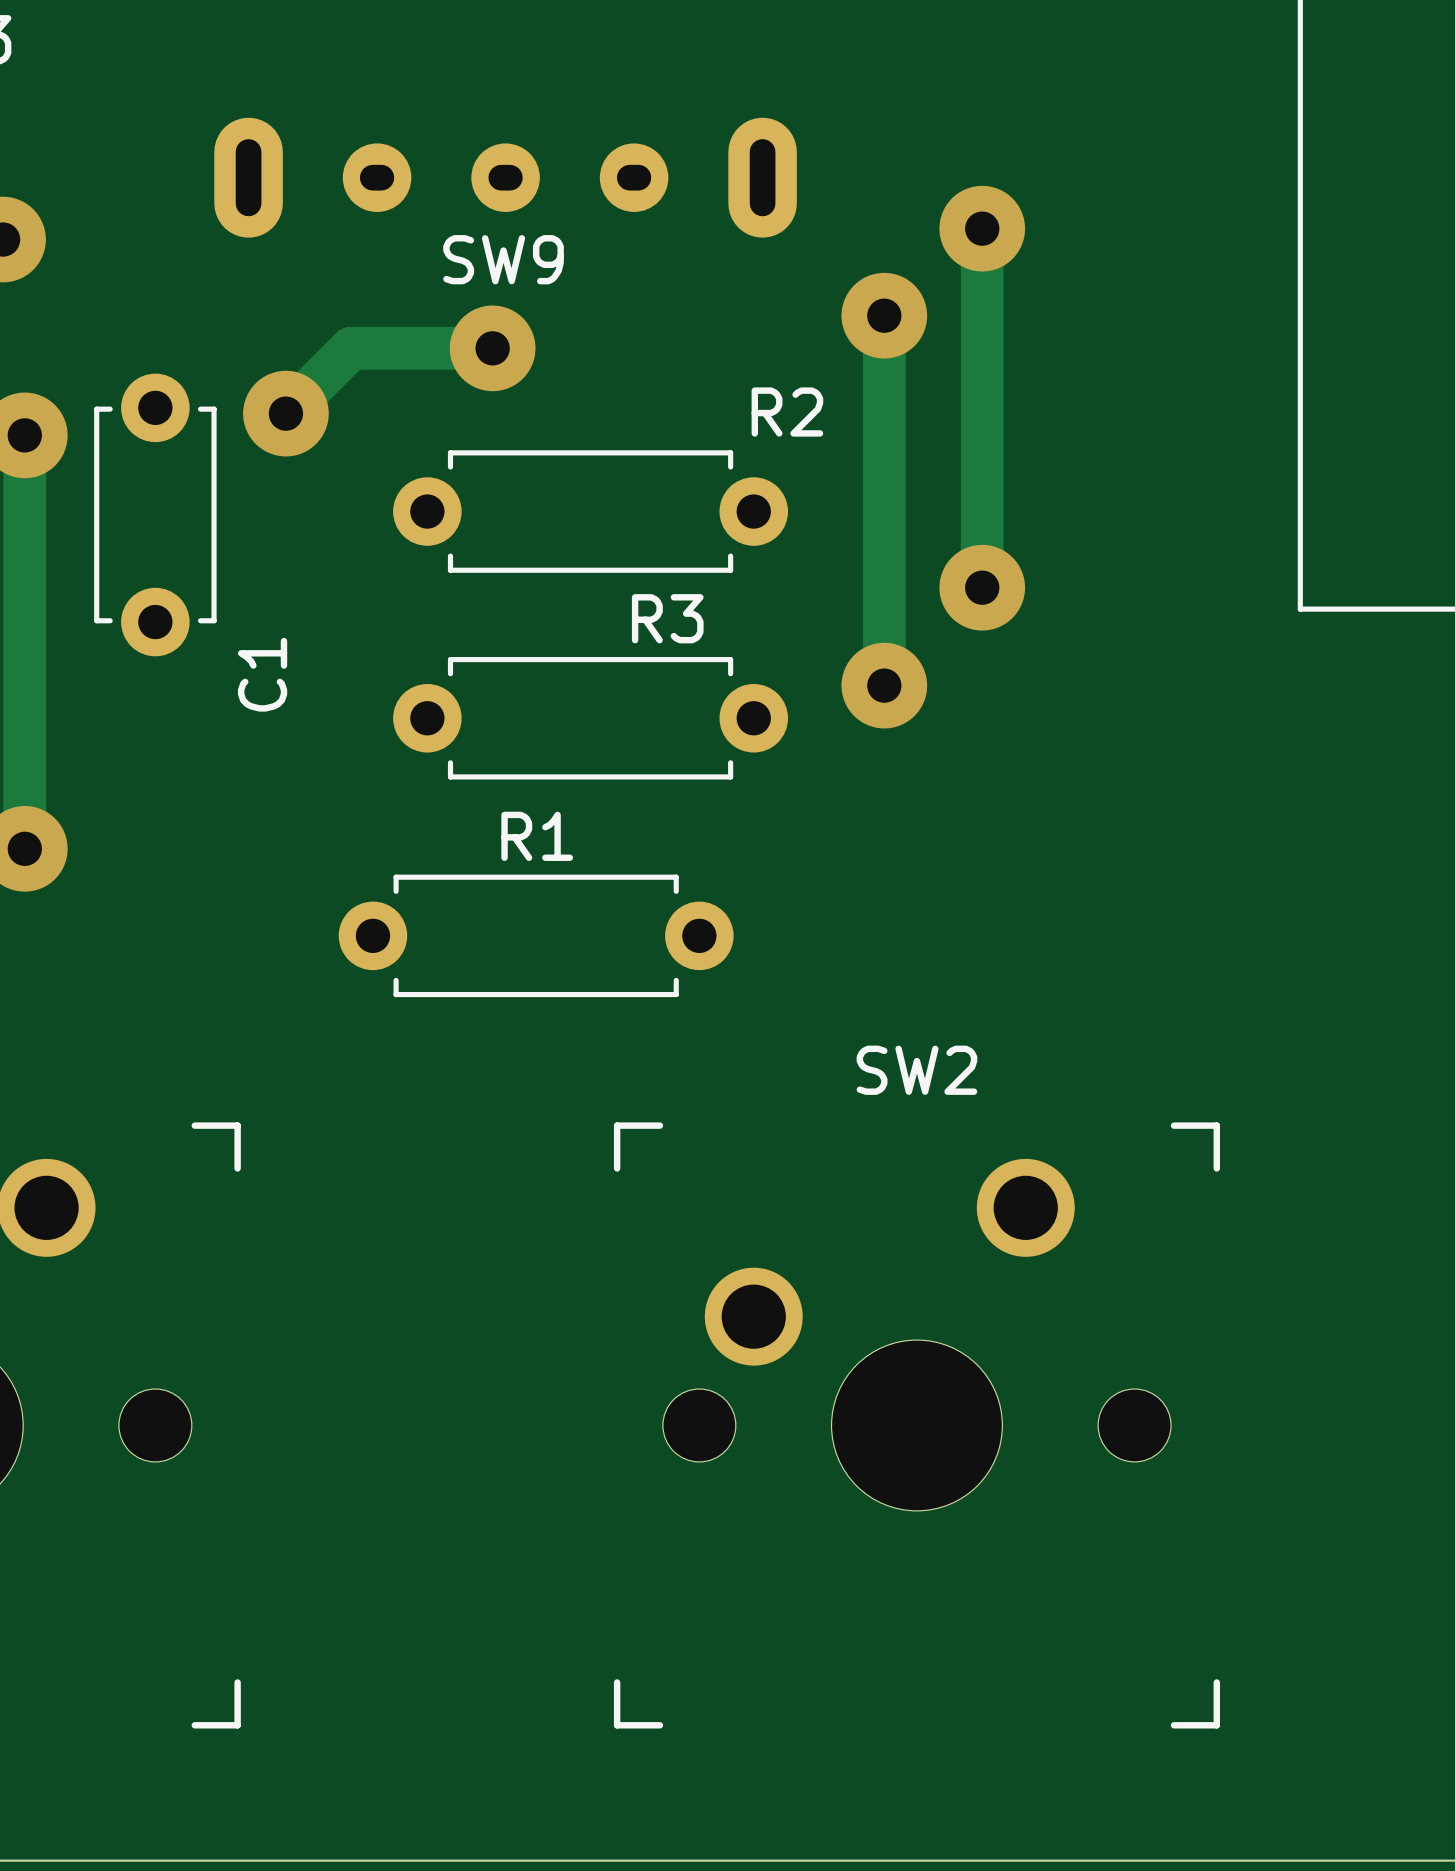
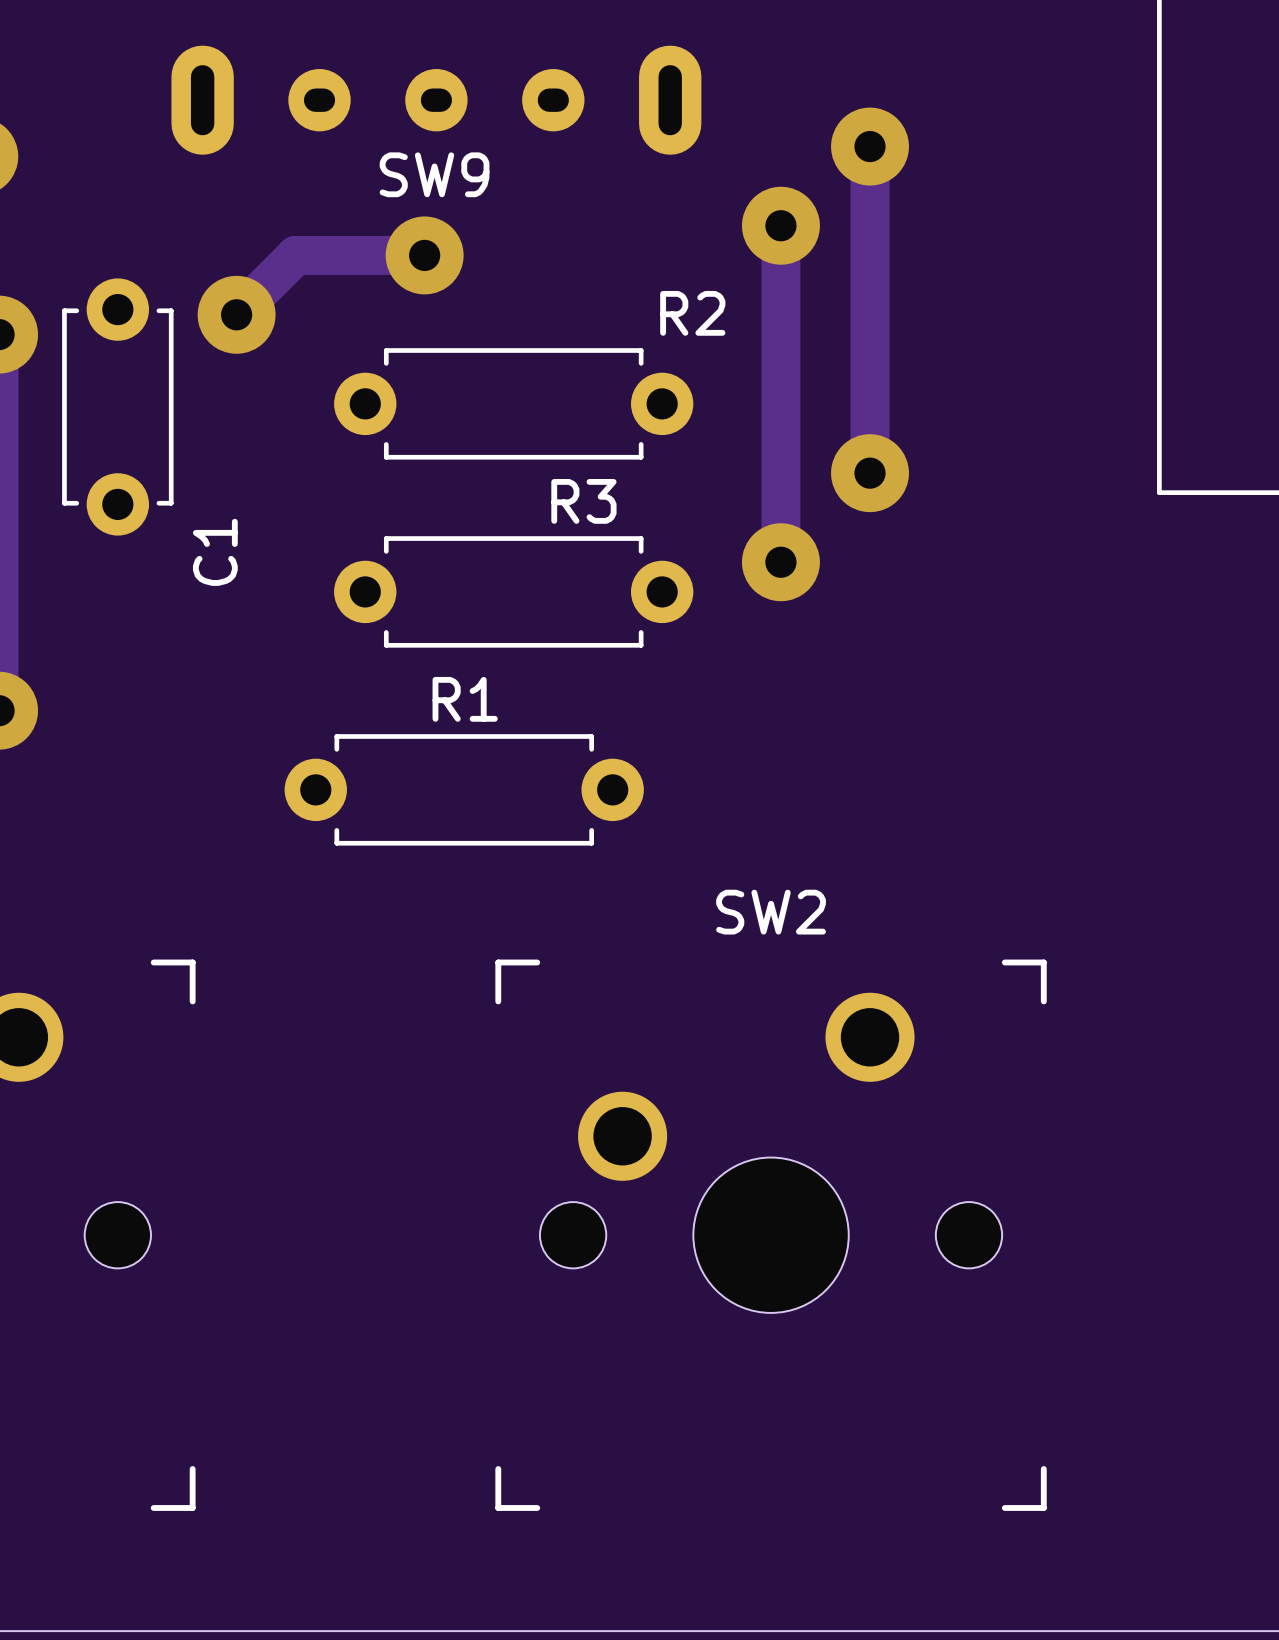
SW2 position: (916, 1425) -> (771, 1235)

